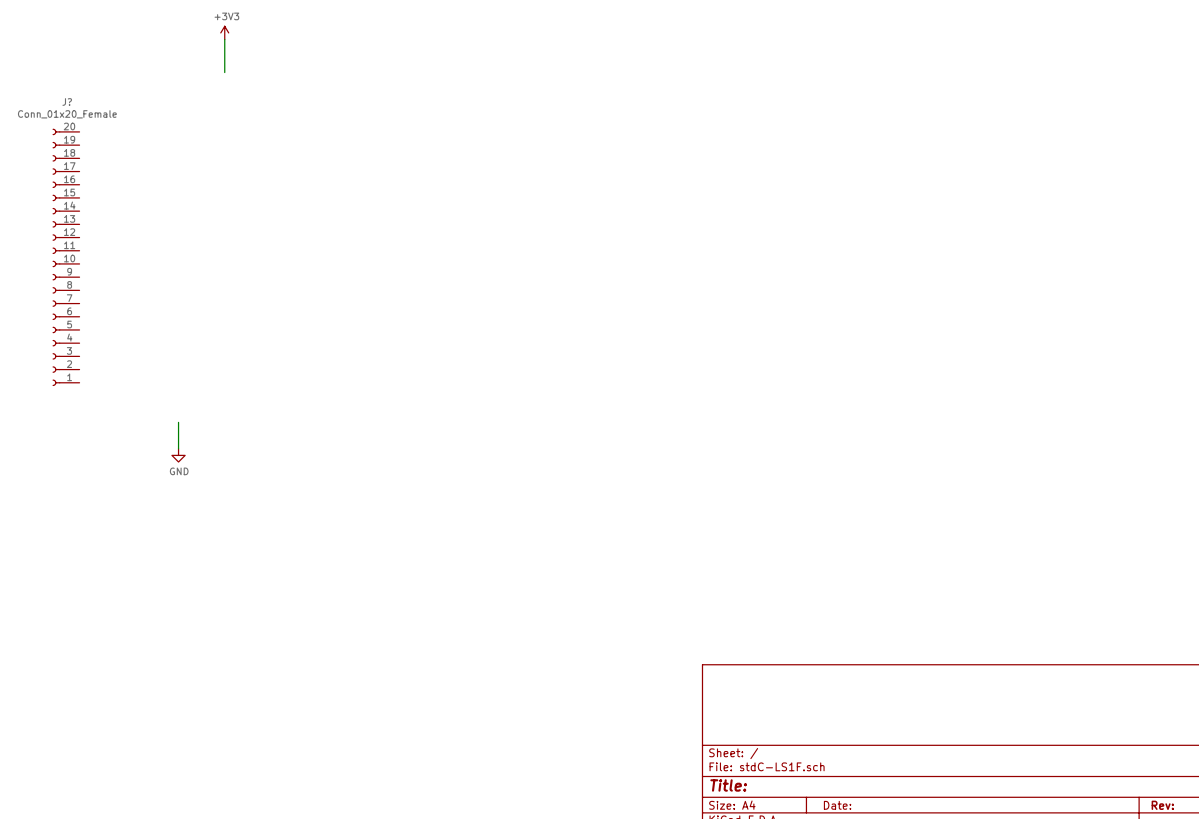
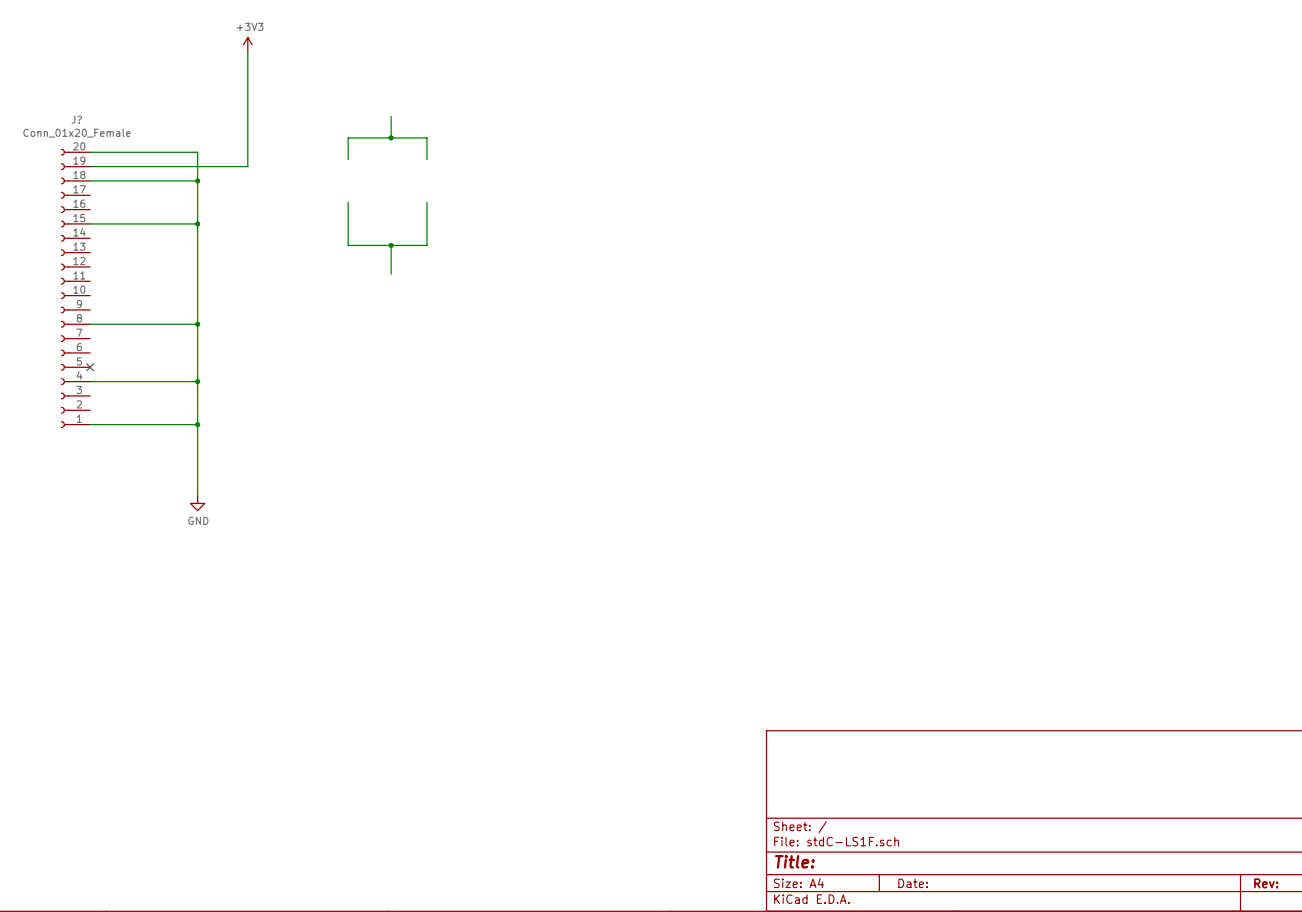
wire: none -> (247, 87) (247, 166) (90, 166)
wire: none -> (391, 116) (391, 137)
junction: none -> (391, 137)
wire: none -> (90, 152) (197, 152) (197, 467)
wire: none -> (348, 159) (348, 137) (426, 137) (426, 159)
wire: none -> (90, 180) (197, 180)
junction: none -> (197, 180)
wire: none -> (348, 202) (348, 245) (426, 245) (426, 202)
wire: none -> (90, 223) (197, 223)
junction: none -> (197, 223)
wire: none -> (391, 245) (391, 274)
junction: none -> (391, 245)
wire: none -> (90, 324) (197, 324)
junction: none -> (197, 324)
no-connect mark: none -> (90, 367)
wire: none -> (90, 381) (197, 381)
junction: none -> (197, 381)
wire: none -> (90, 424) (197, 424)
junction: none -> (197, 424)

